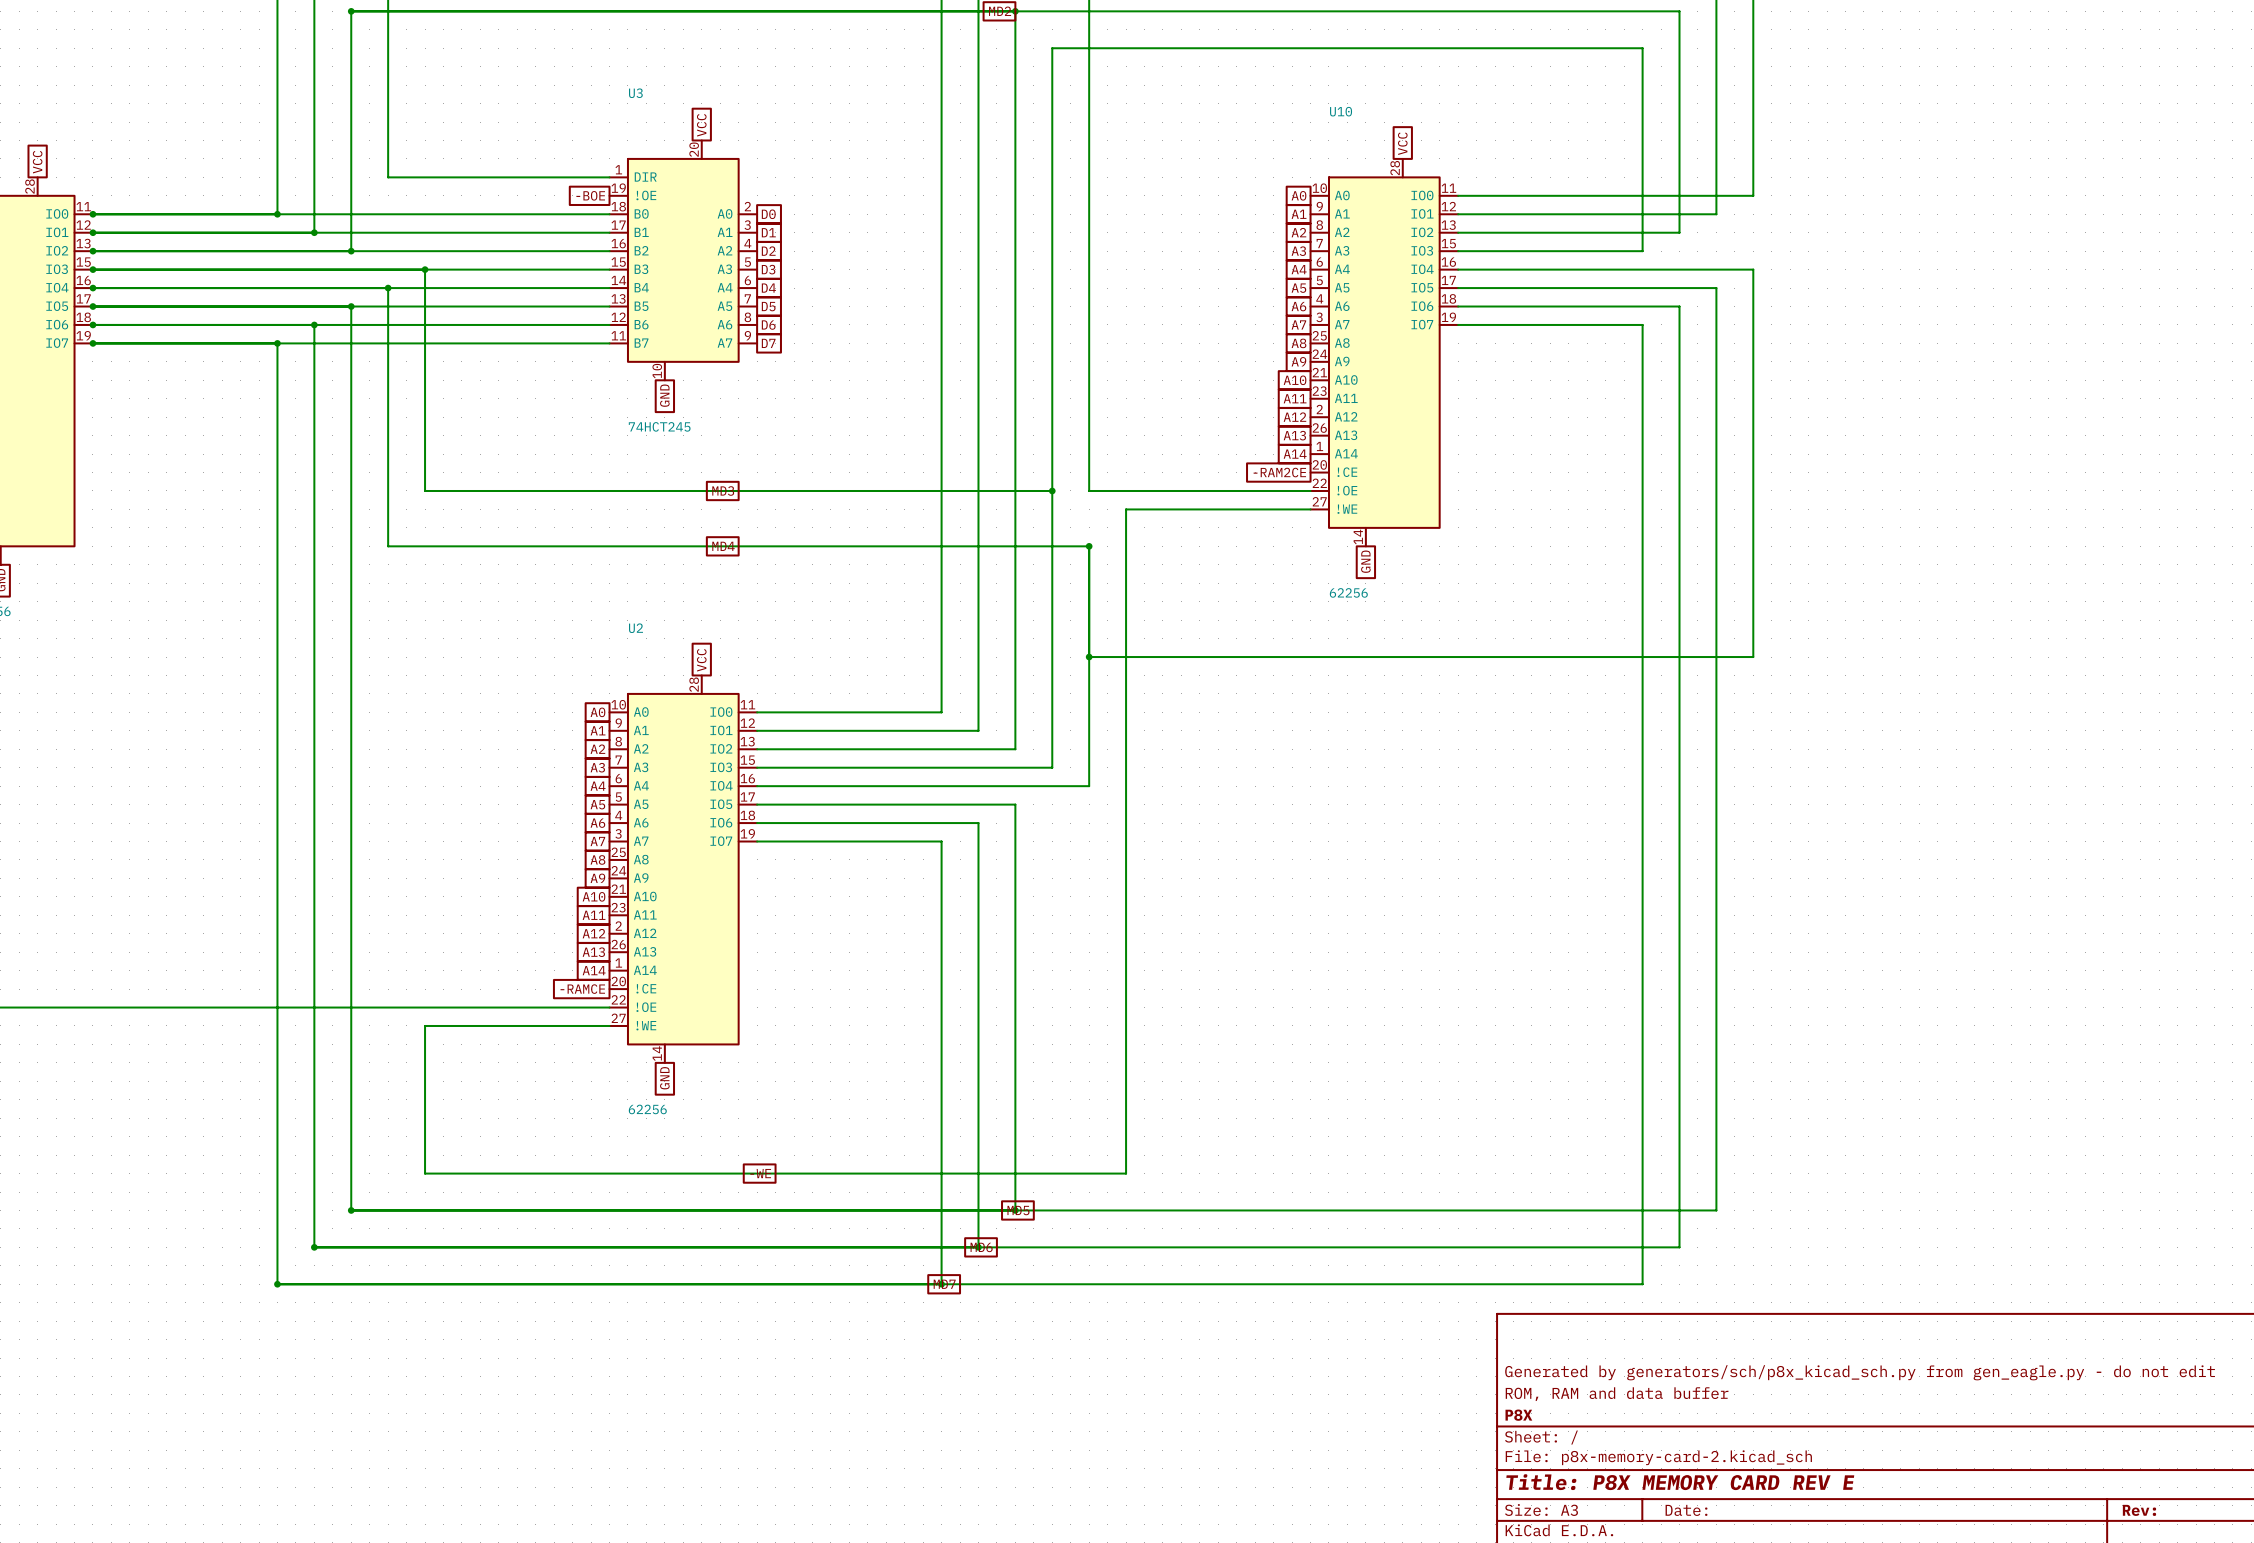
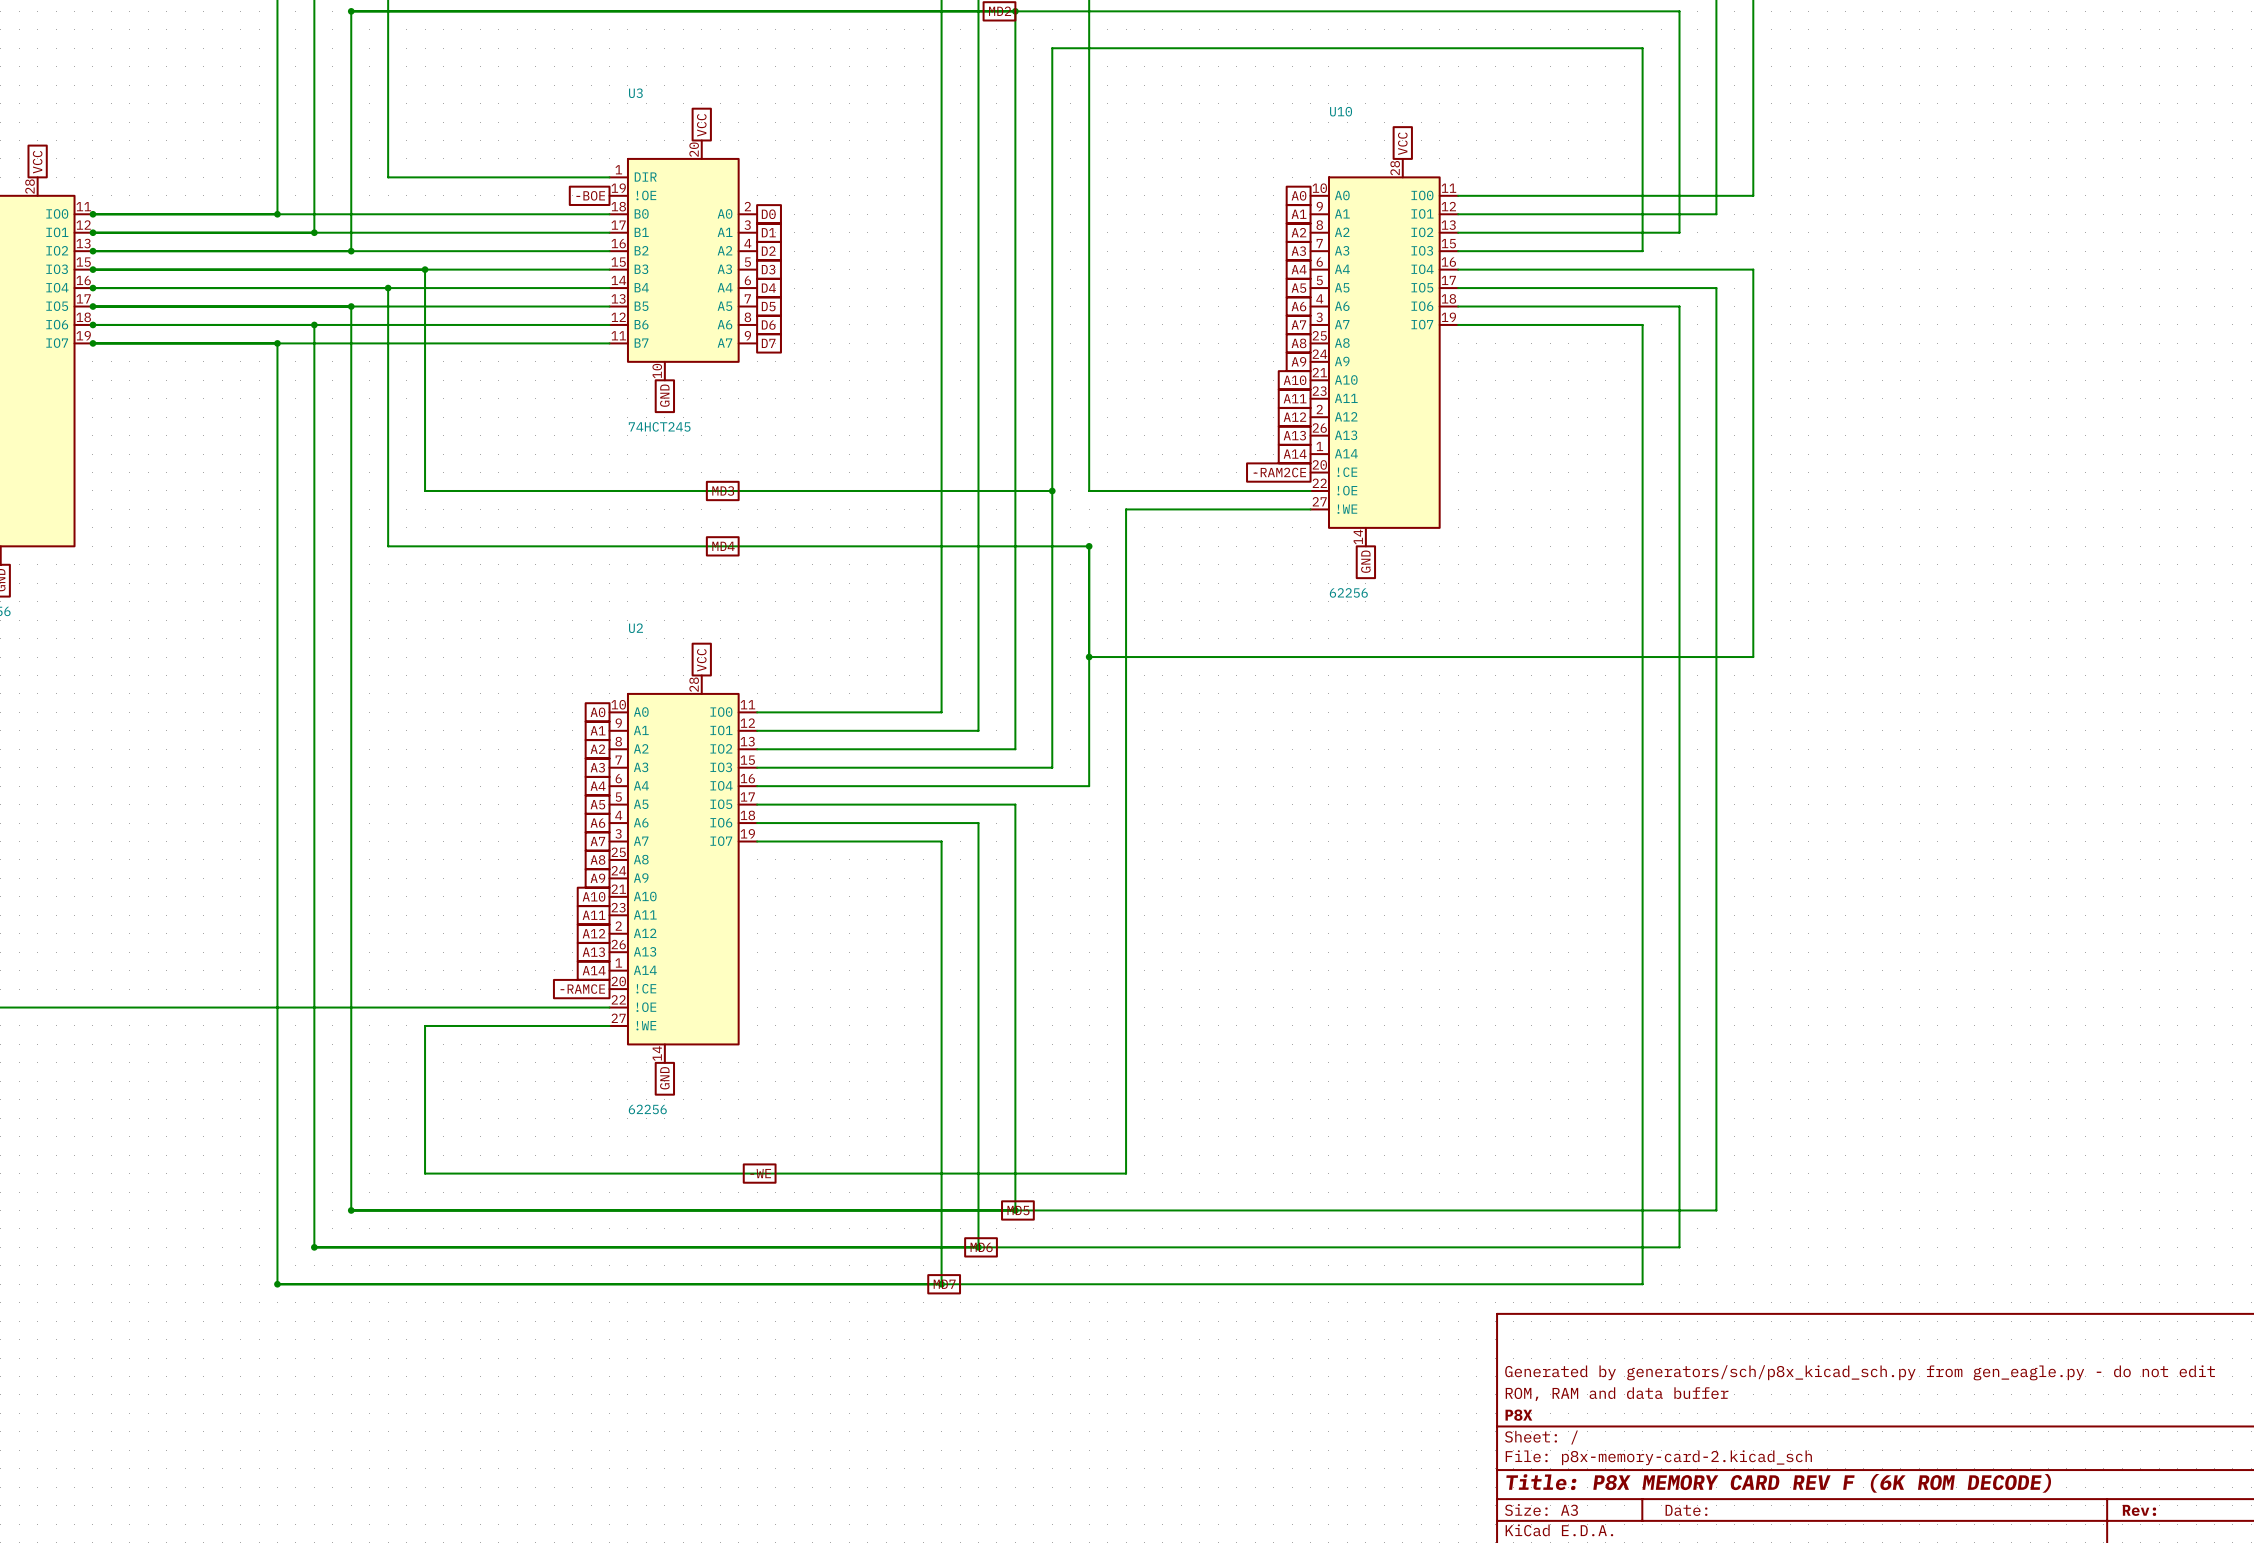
title block: Title: P8X MEMORY CARD REV E (1680, 1482) -> Title: P8X MEMORY CARD REV F (6K ROM DECODE) (1778, 1483)

